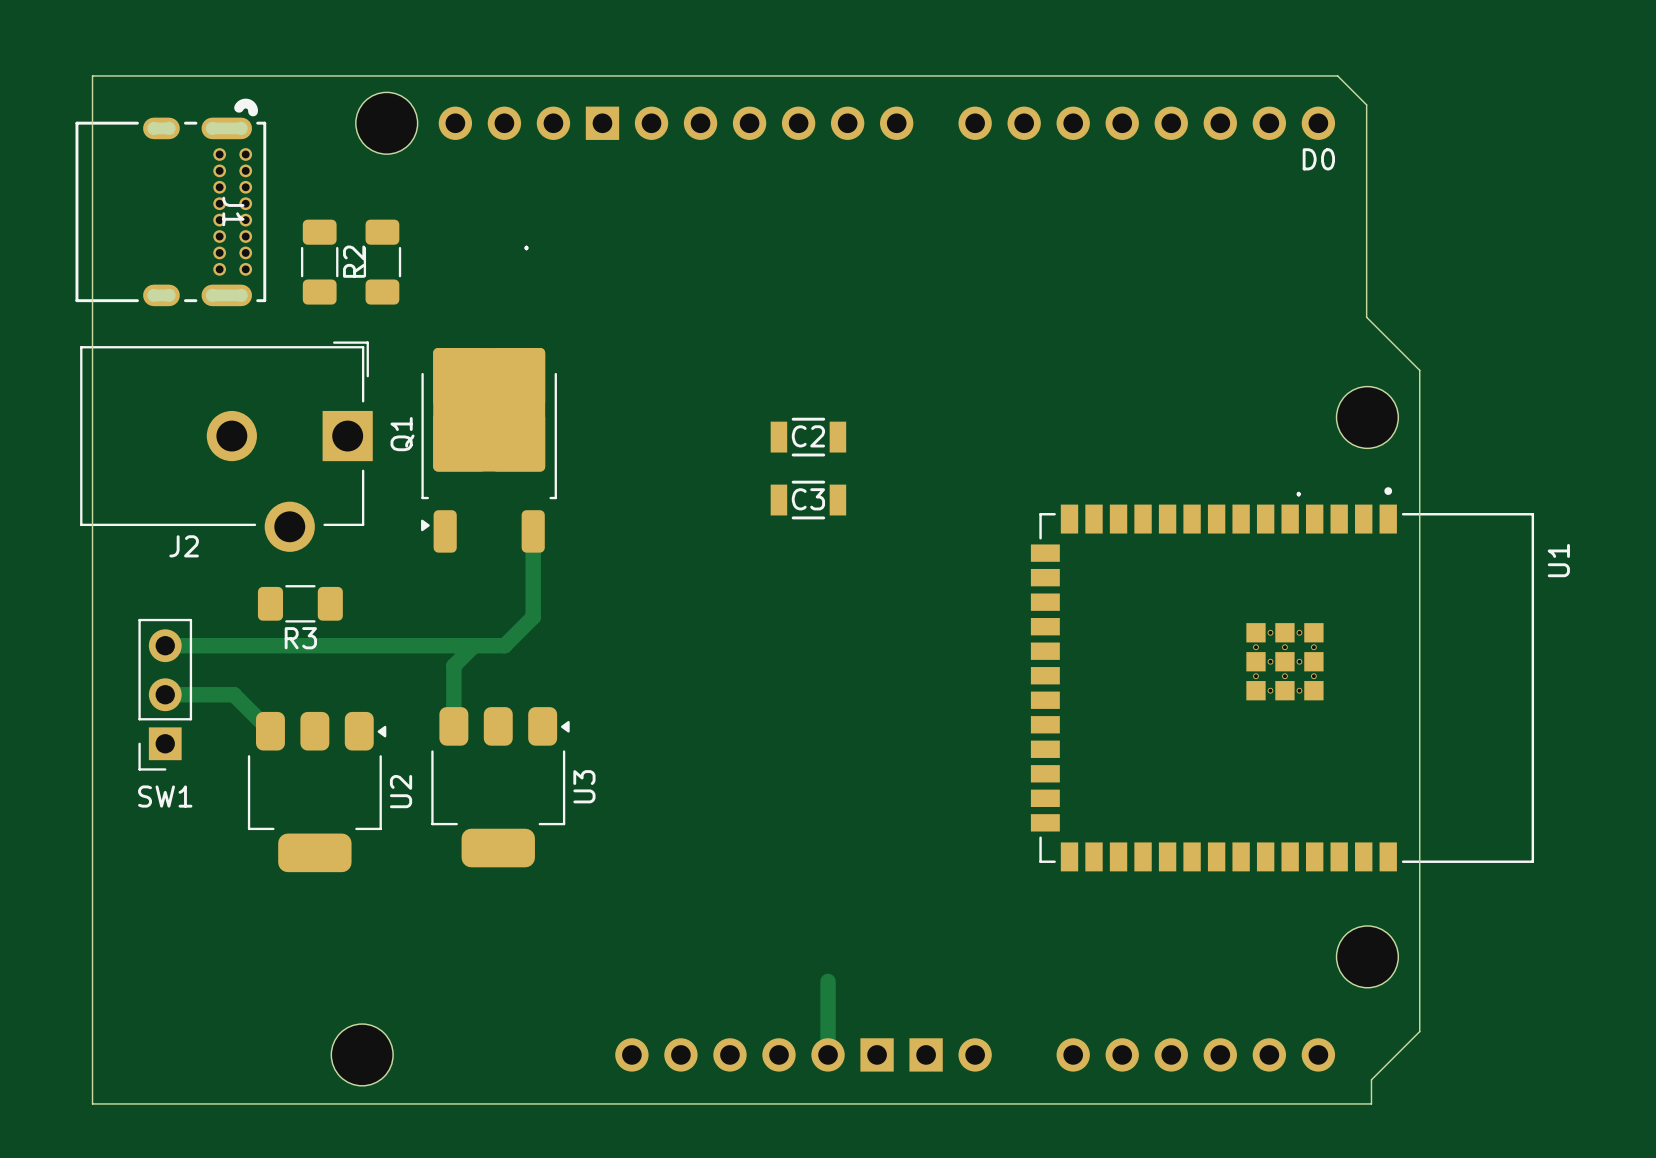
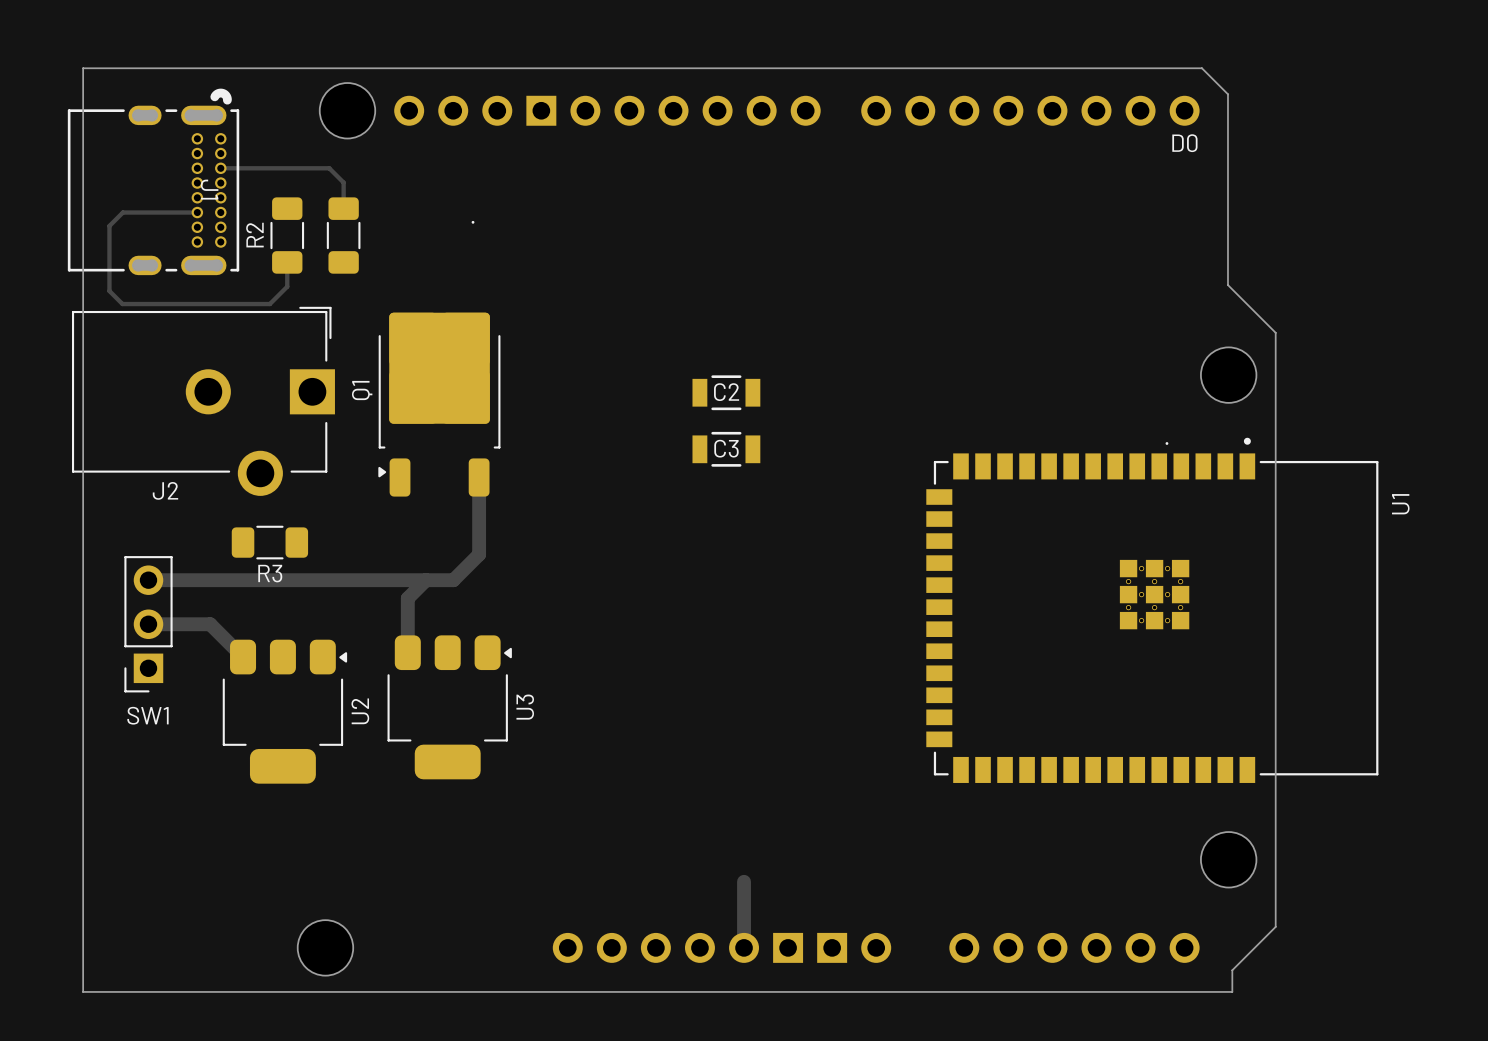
track: none -> (220, 168) (329, 168) (343, 182) (343, 208)
track: none -> (197, 212) (122, 212) (109, 225) (109, 291) (122, 304) (269, 304) (287, 286) (287, 262)
R2 name position: R2 (354, 261) -> R2 (254, 235)

